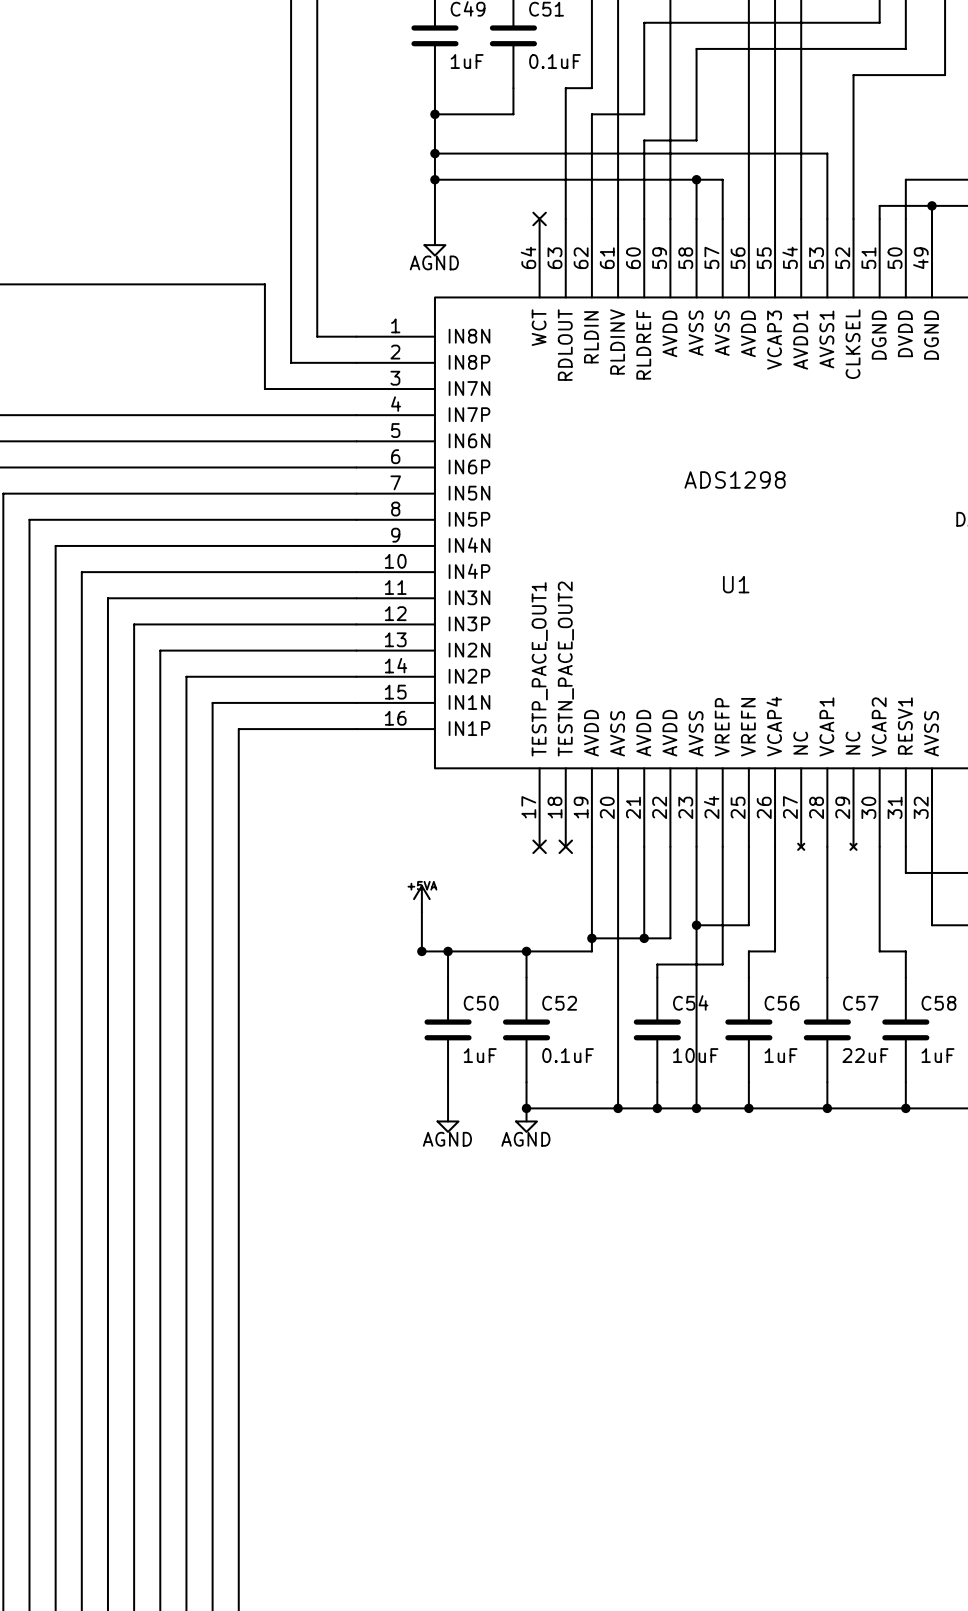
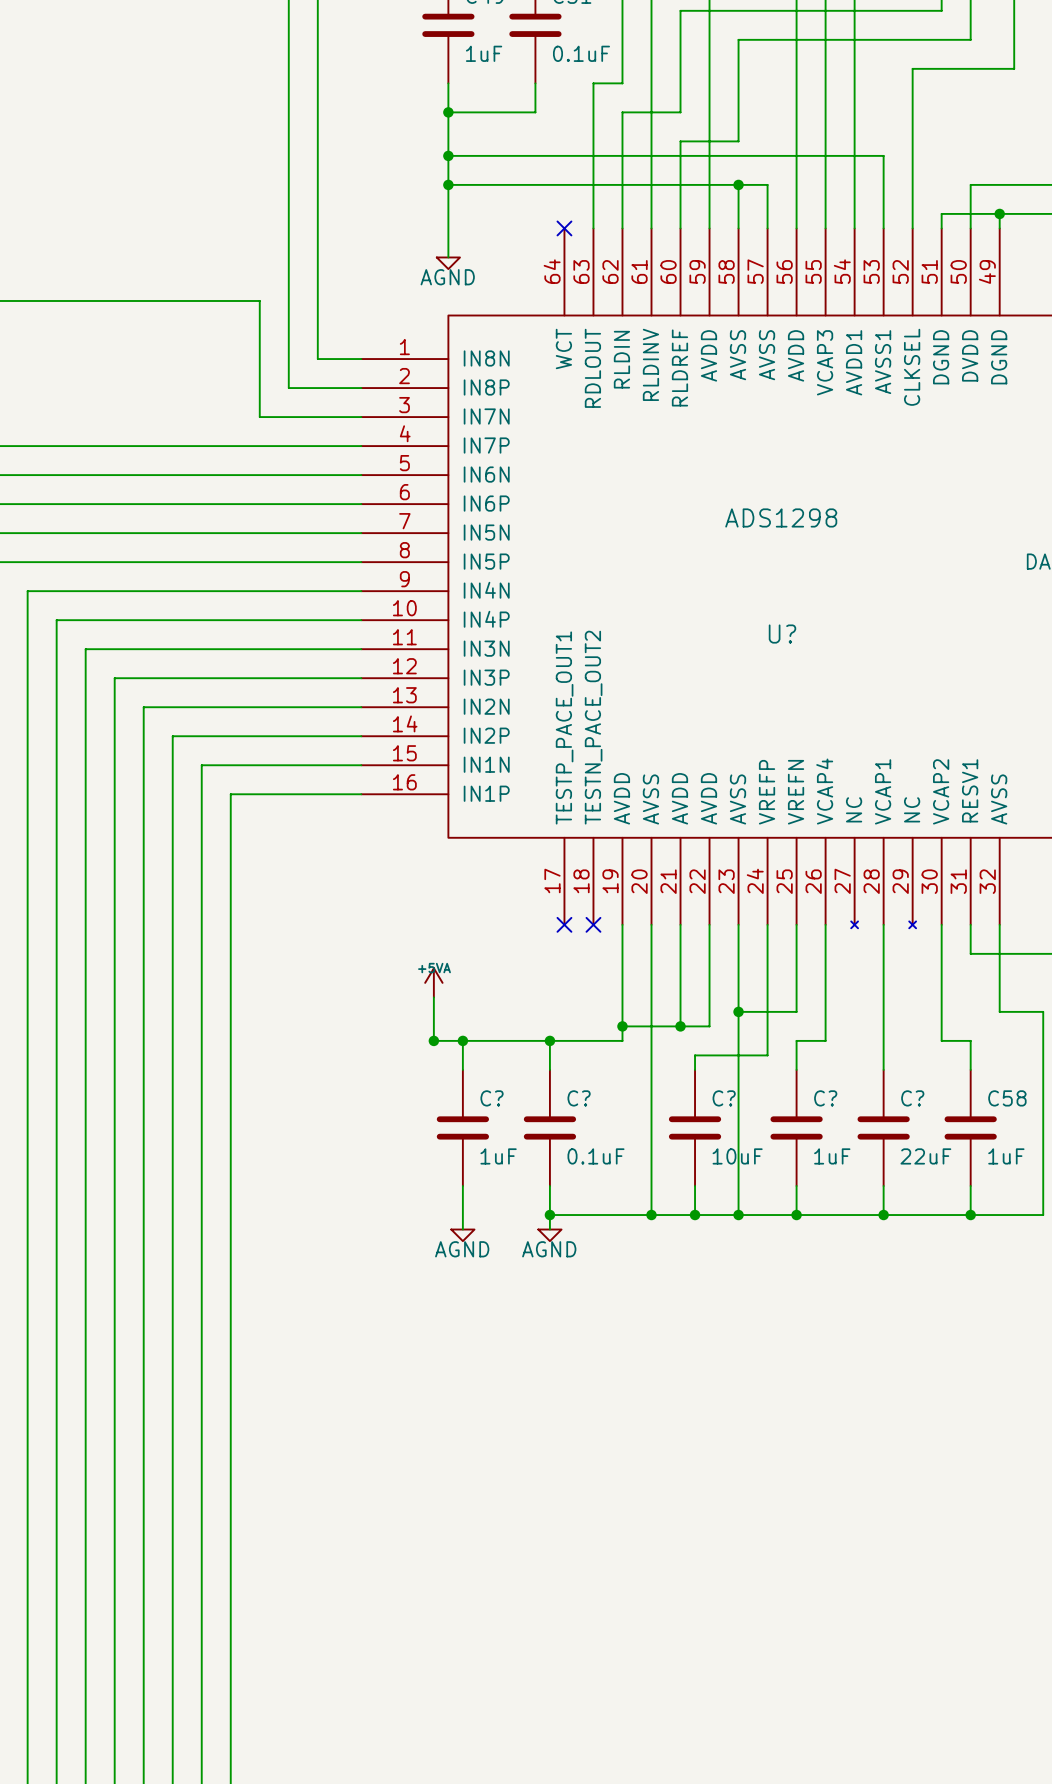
U1 name: U1 (736, 584) -> U? (782, 634)
C54 name: C54 (690, 1002) -> C? (724, 1098)
C50 name: C50 (481, 1003) -> C? (492, 1098)
C52 name: C52 (559, 1003) -> C? (579, 1098)
C56 name: C56 (781, 1003) -> C? (825, 1098)
C57 name: C57 (860, 1003) -> C? (912, 1098)

